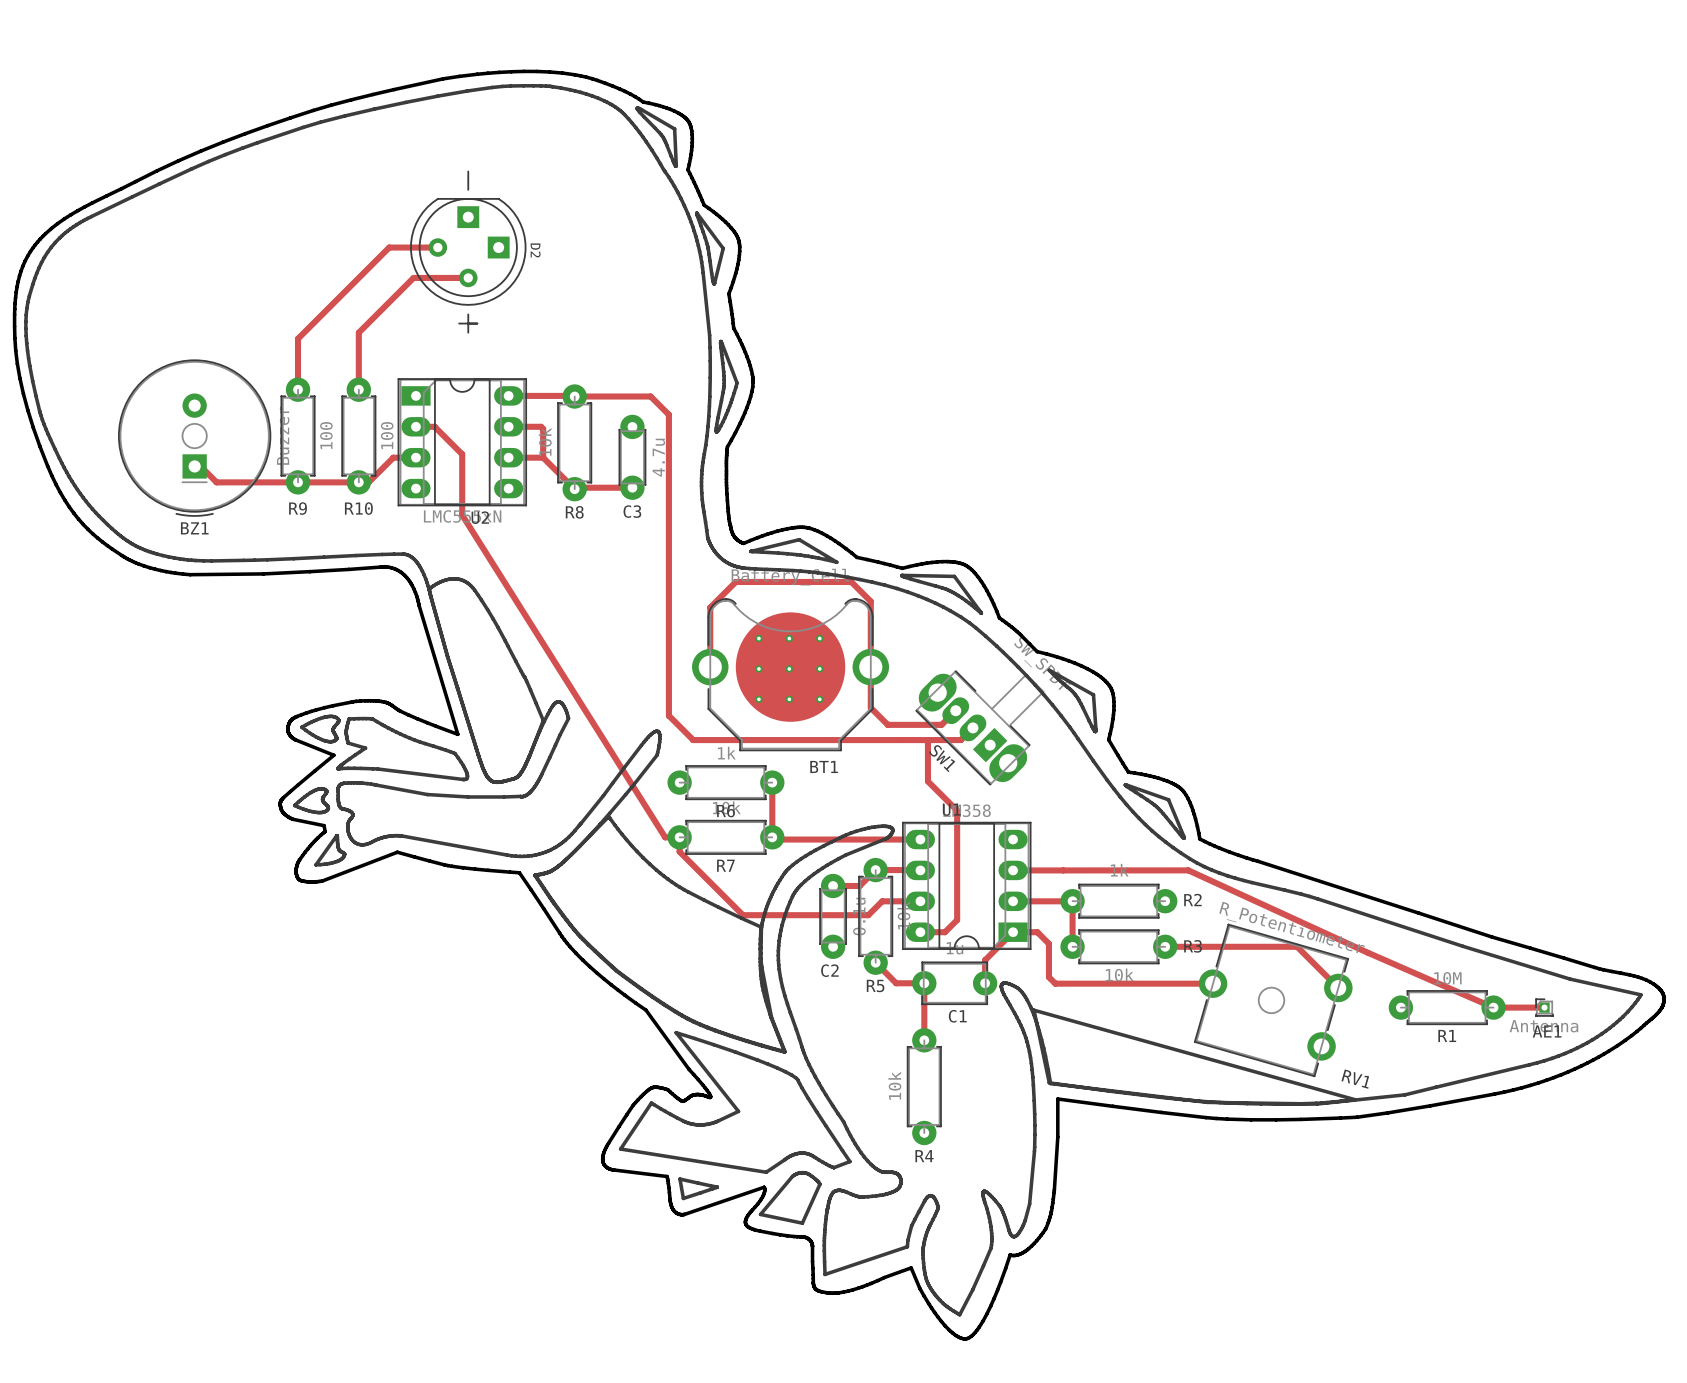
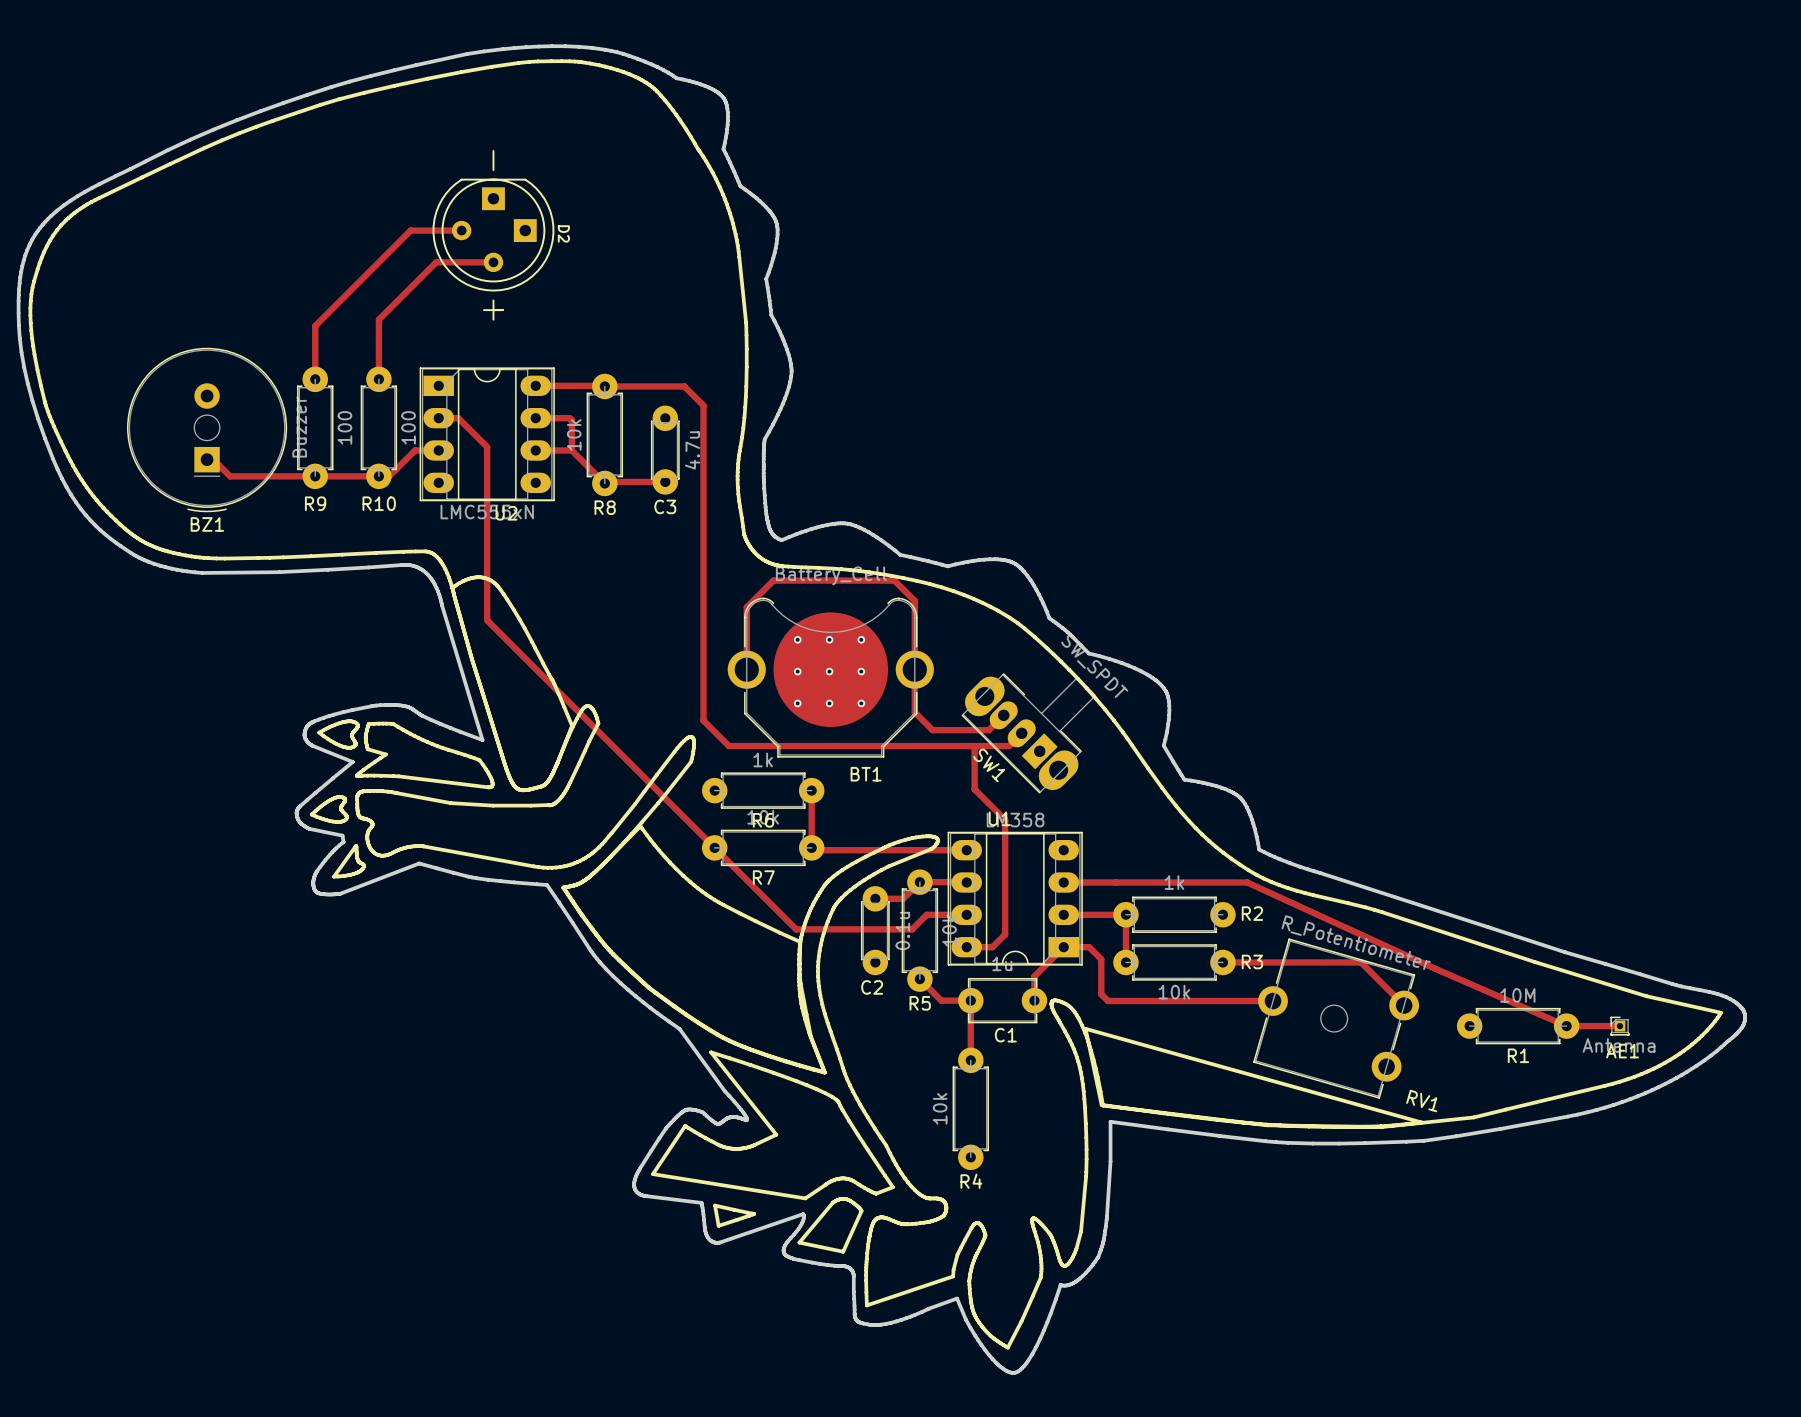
line: (675, 166) (662, 136) (637, 108) (674, 128) (676, 166) -> none
line: (696, 213) (723, 248) (714, 283) -> none
line: (696, 213) (707, 246) (714, 283) -> none
line: (720, 341) (724, 383) (716, 432) (726, 414) (737, 383) (720, 341) -> none
track: (462, 515) (665, 837) (679, 837) (679, 851) (742, 915) (757, 915) -> (487, 510) (487, 620) (796, 929)
line: (751, 551) (799, 539) (836, 562) (800, 555) (751, 551) -> none
line: (901, 575) (954, 576) (981, 612) -> none
line: (901, 575) (948, 590) (962, 598) (981, 613) -> none
line: (1049, 670) (1076, 695) (1095, 731) (1093, 694) (1049, 670) -> none
line: (1125, 784) (1168, 799) (1184, 838) -> none
line: (1125, 785) (1156, 806) (1184, 838) -> none

